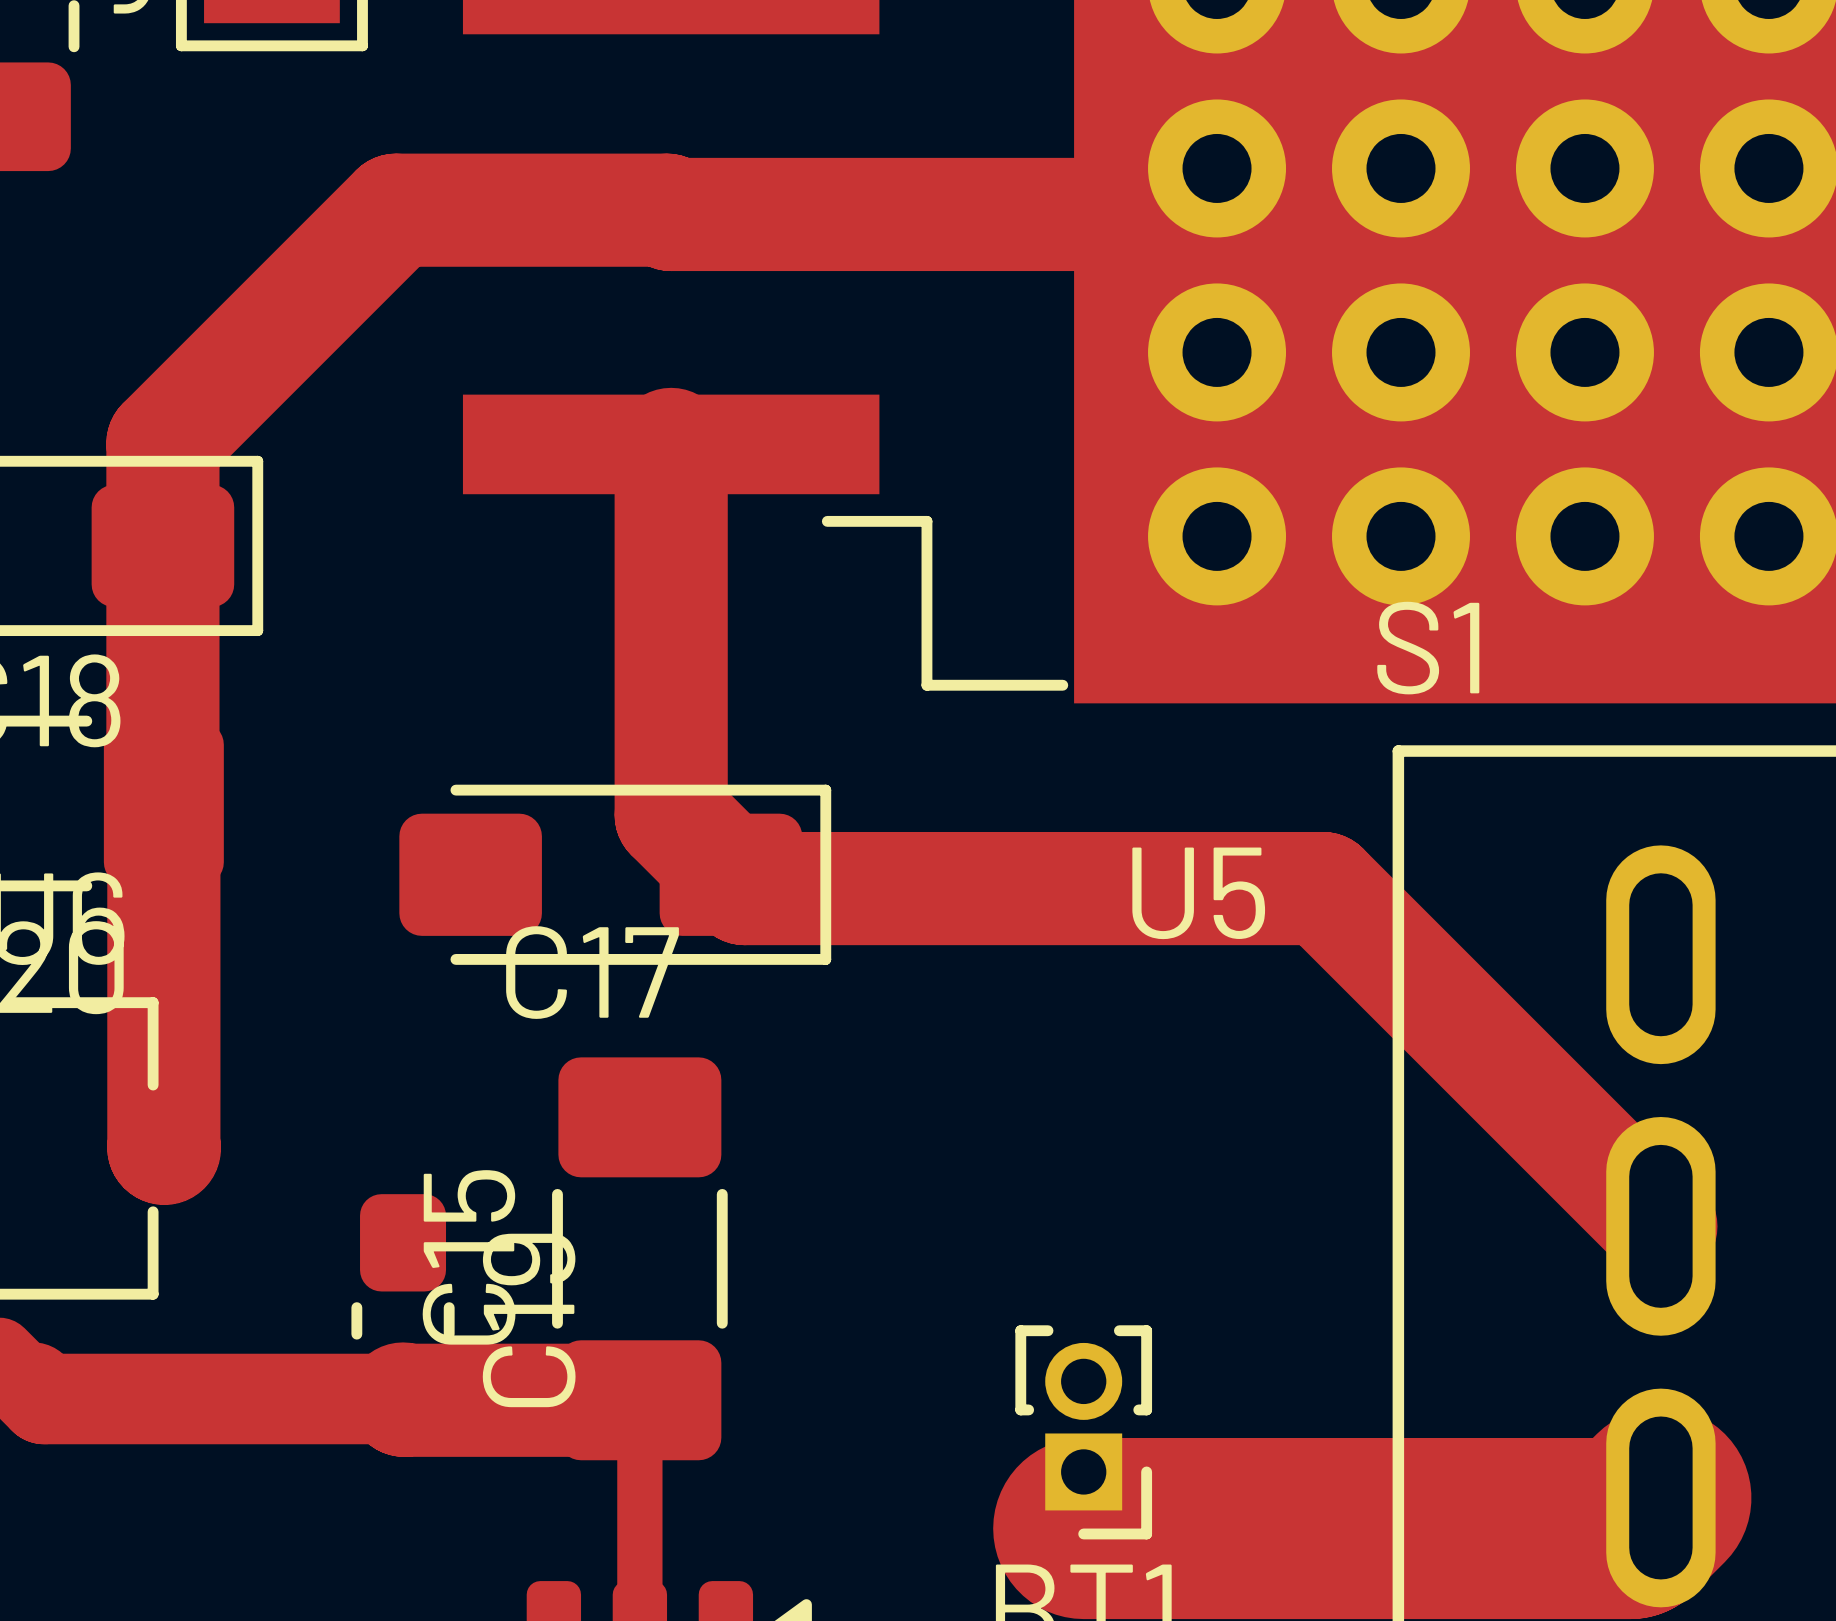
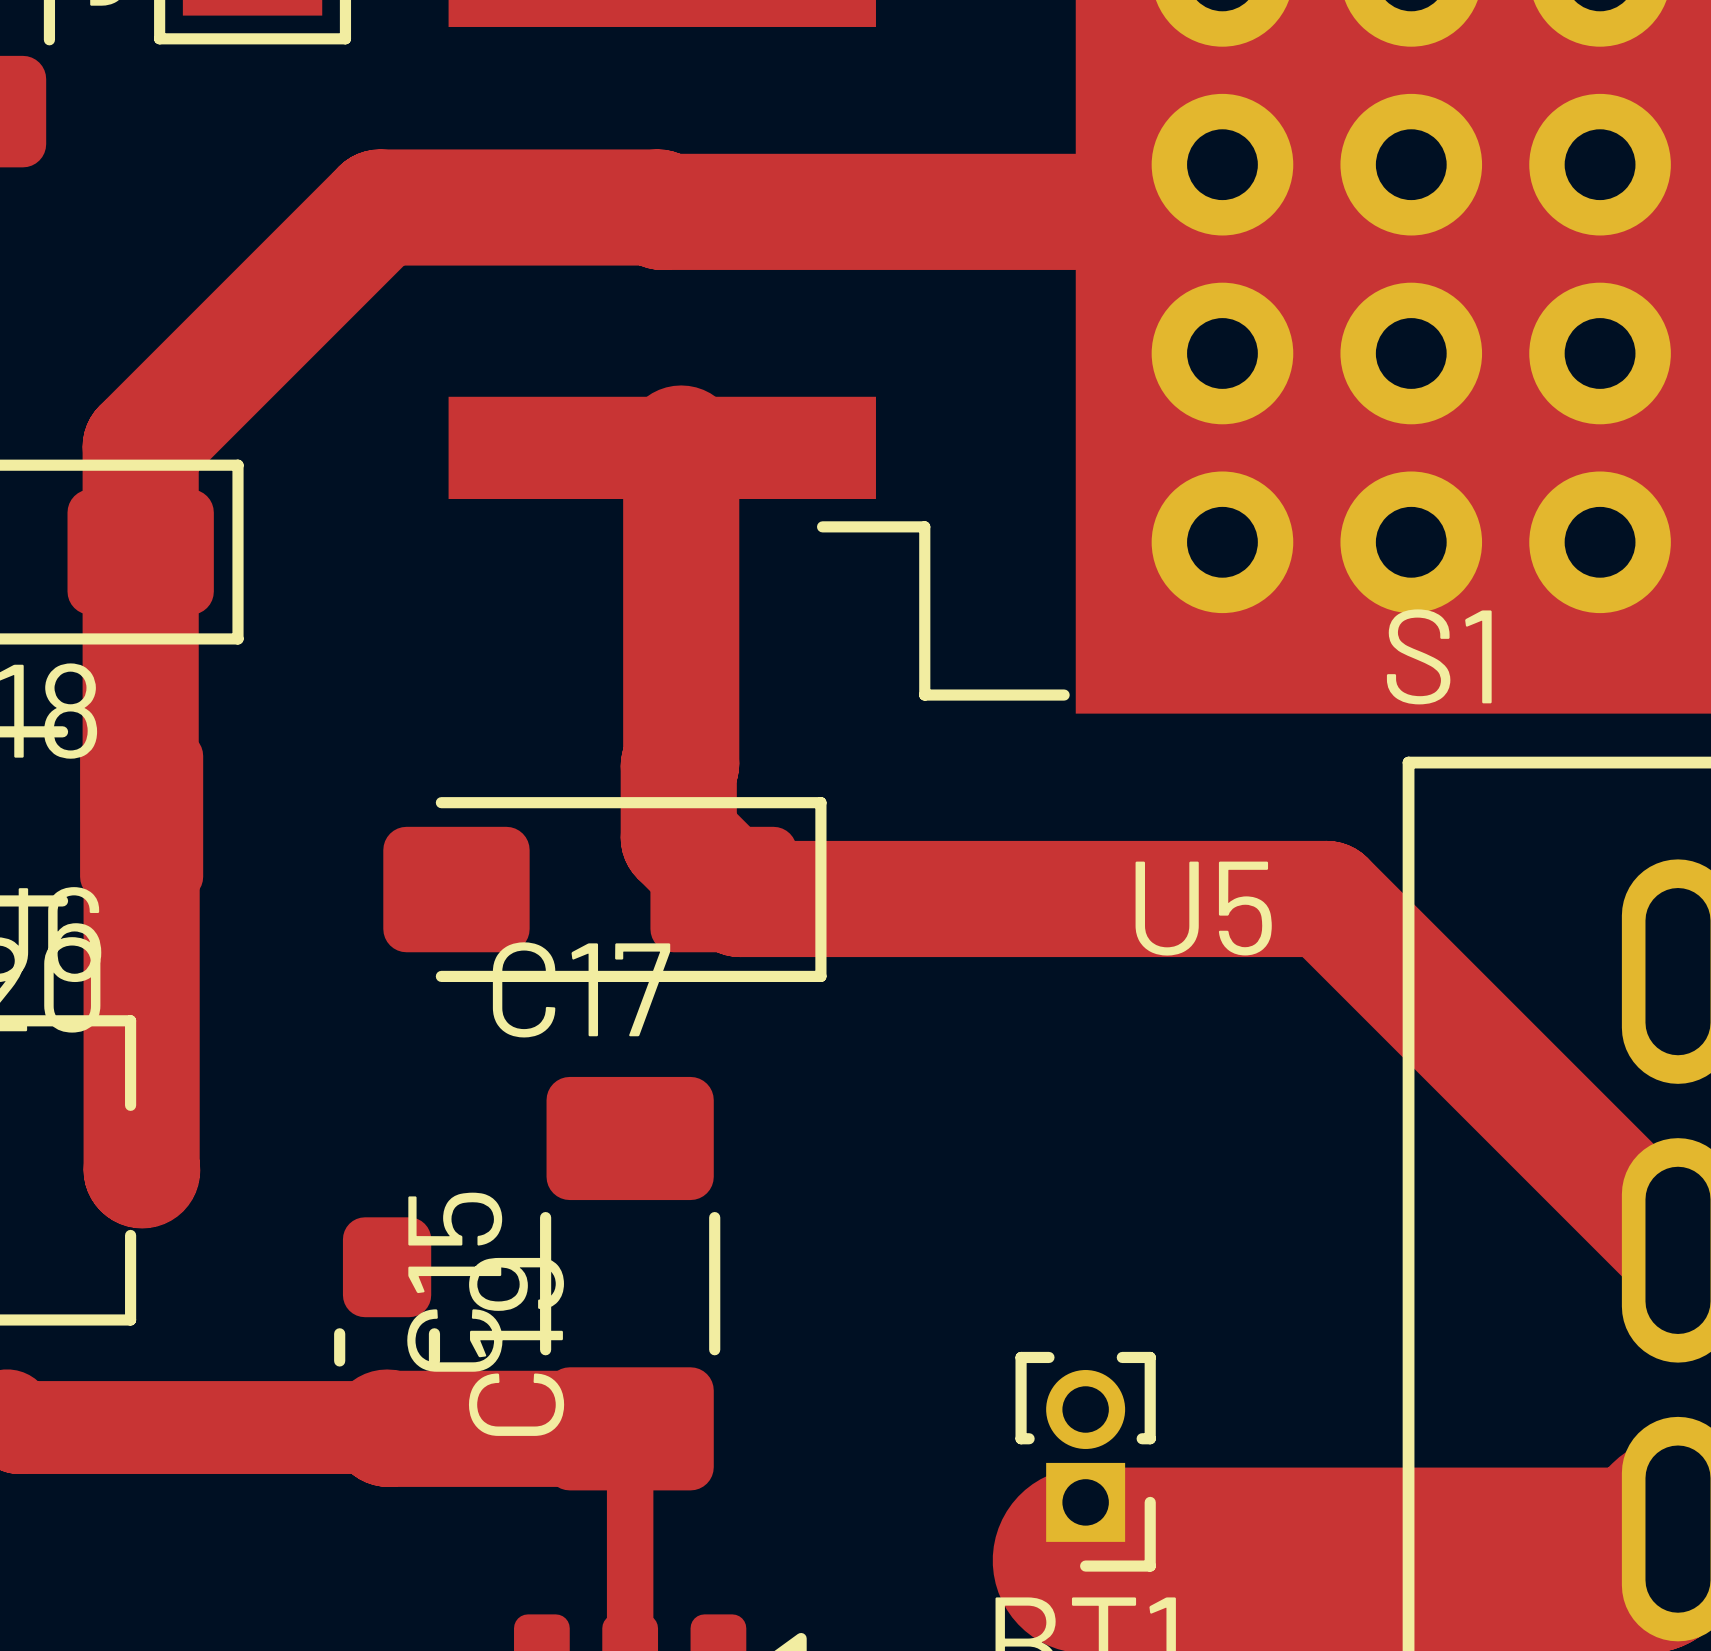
track: (671, 444) (671, 815) (744, 888) (1323, 888) -> (681, 443) (681, 763) (678, 766) (678, 837) (740, 898) (1326, 898) (1331, 903)

